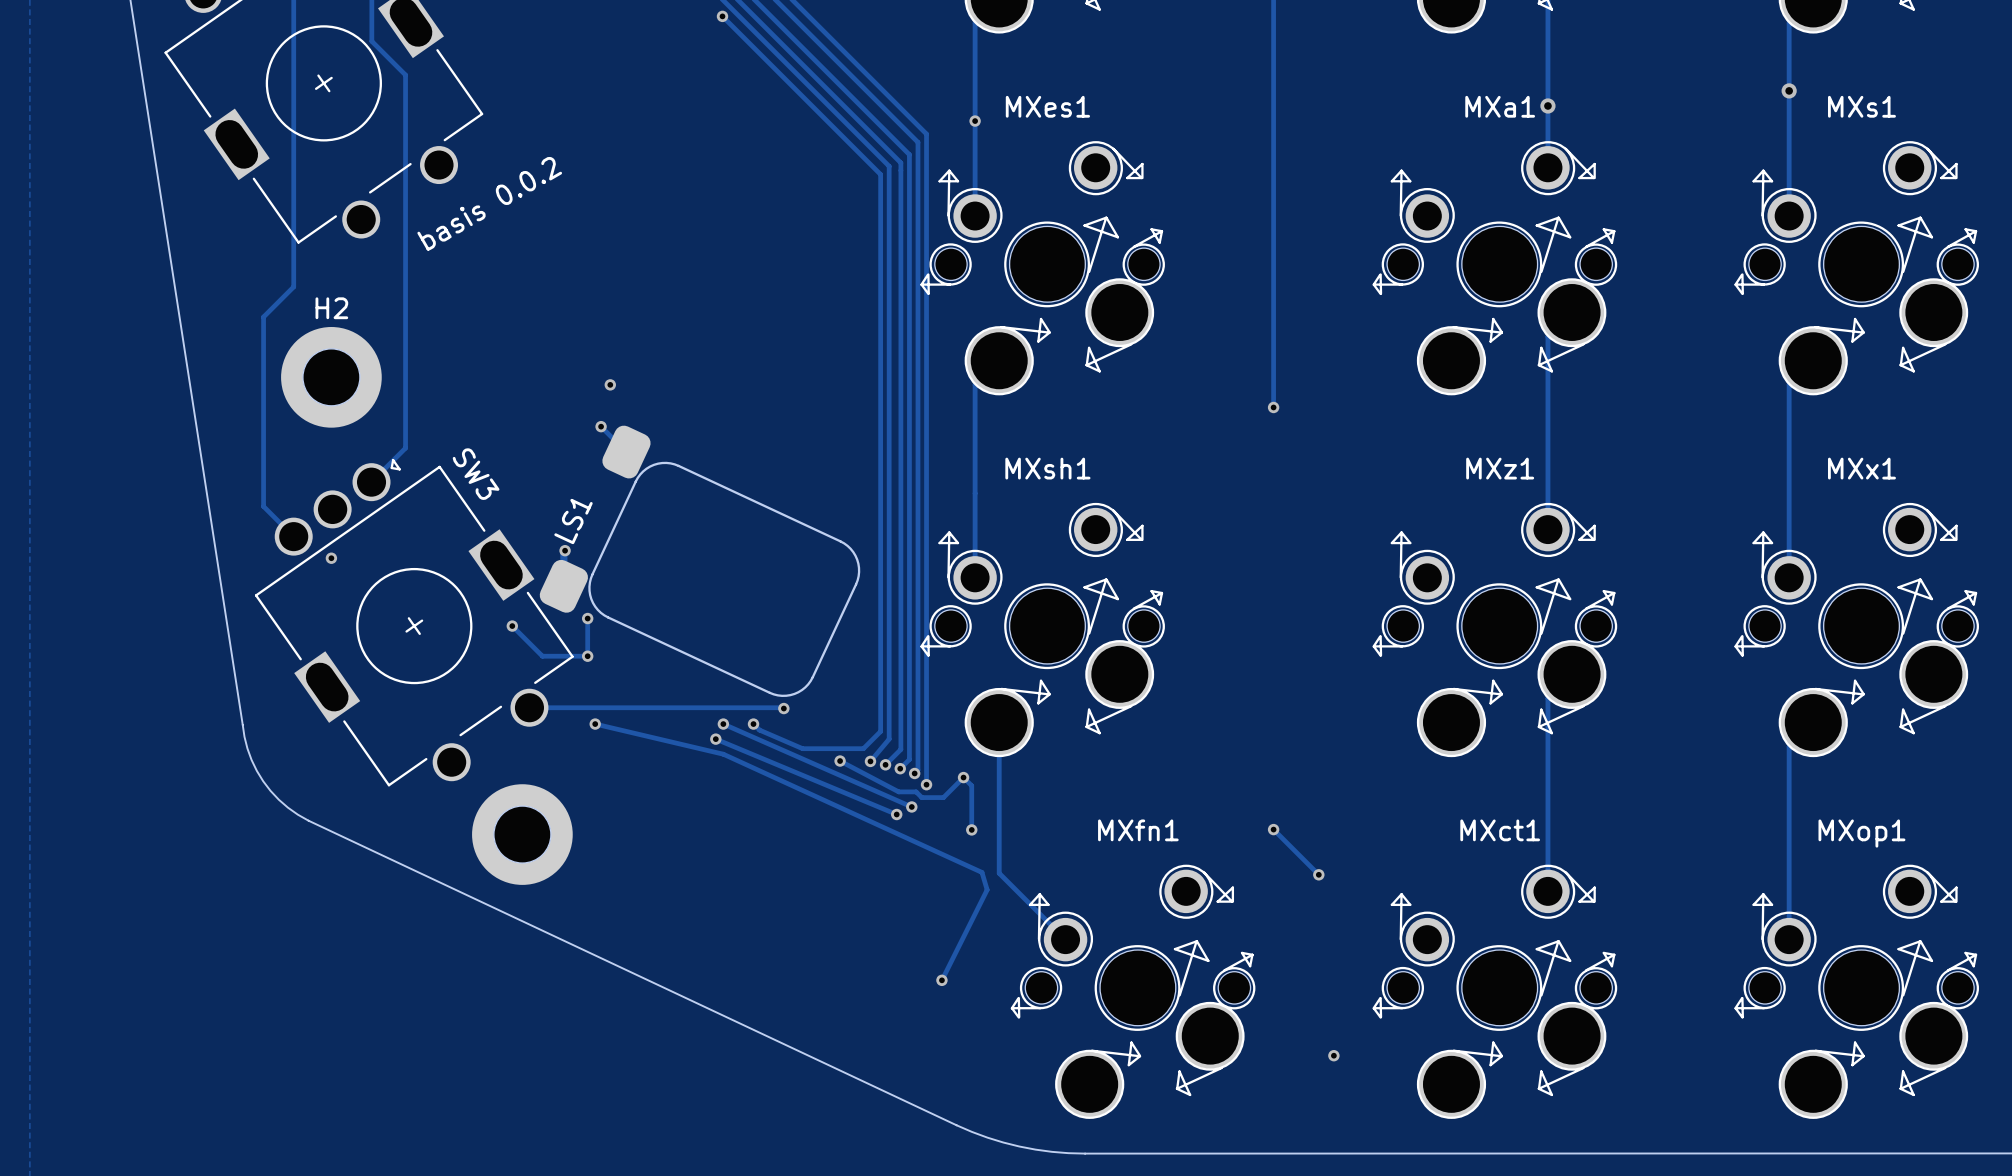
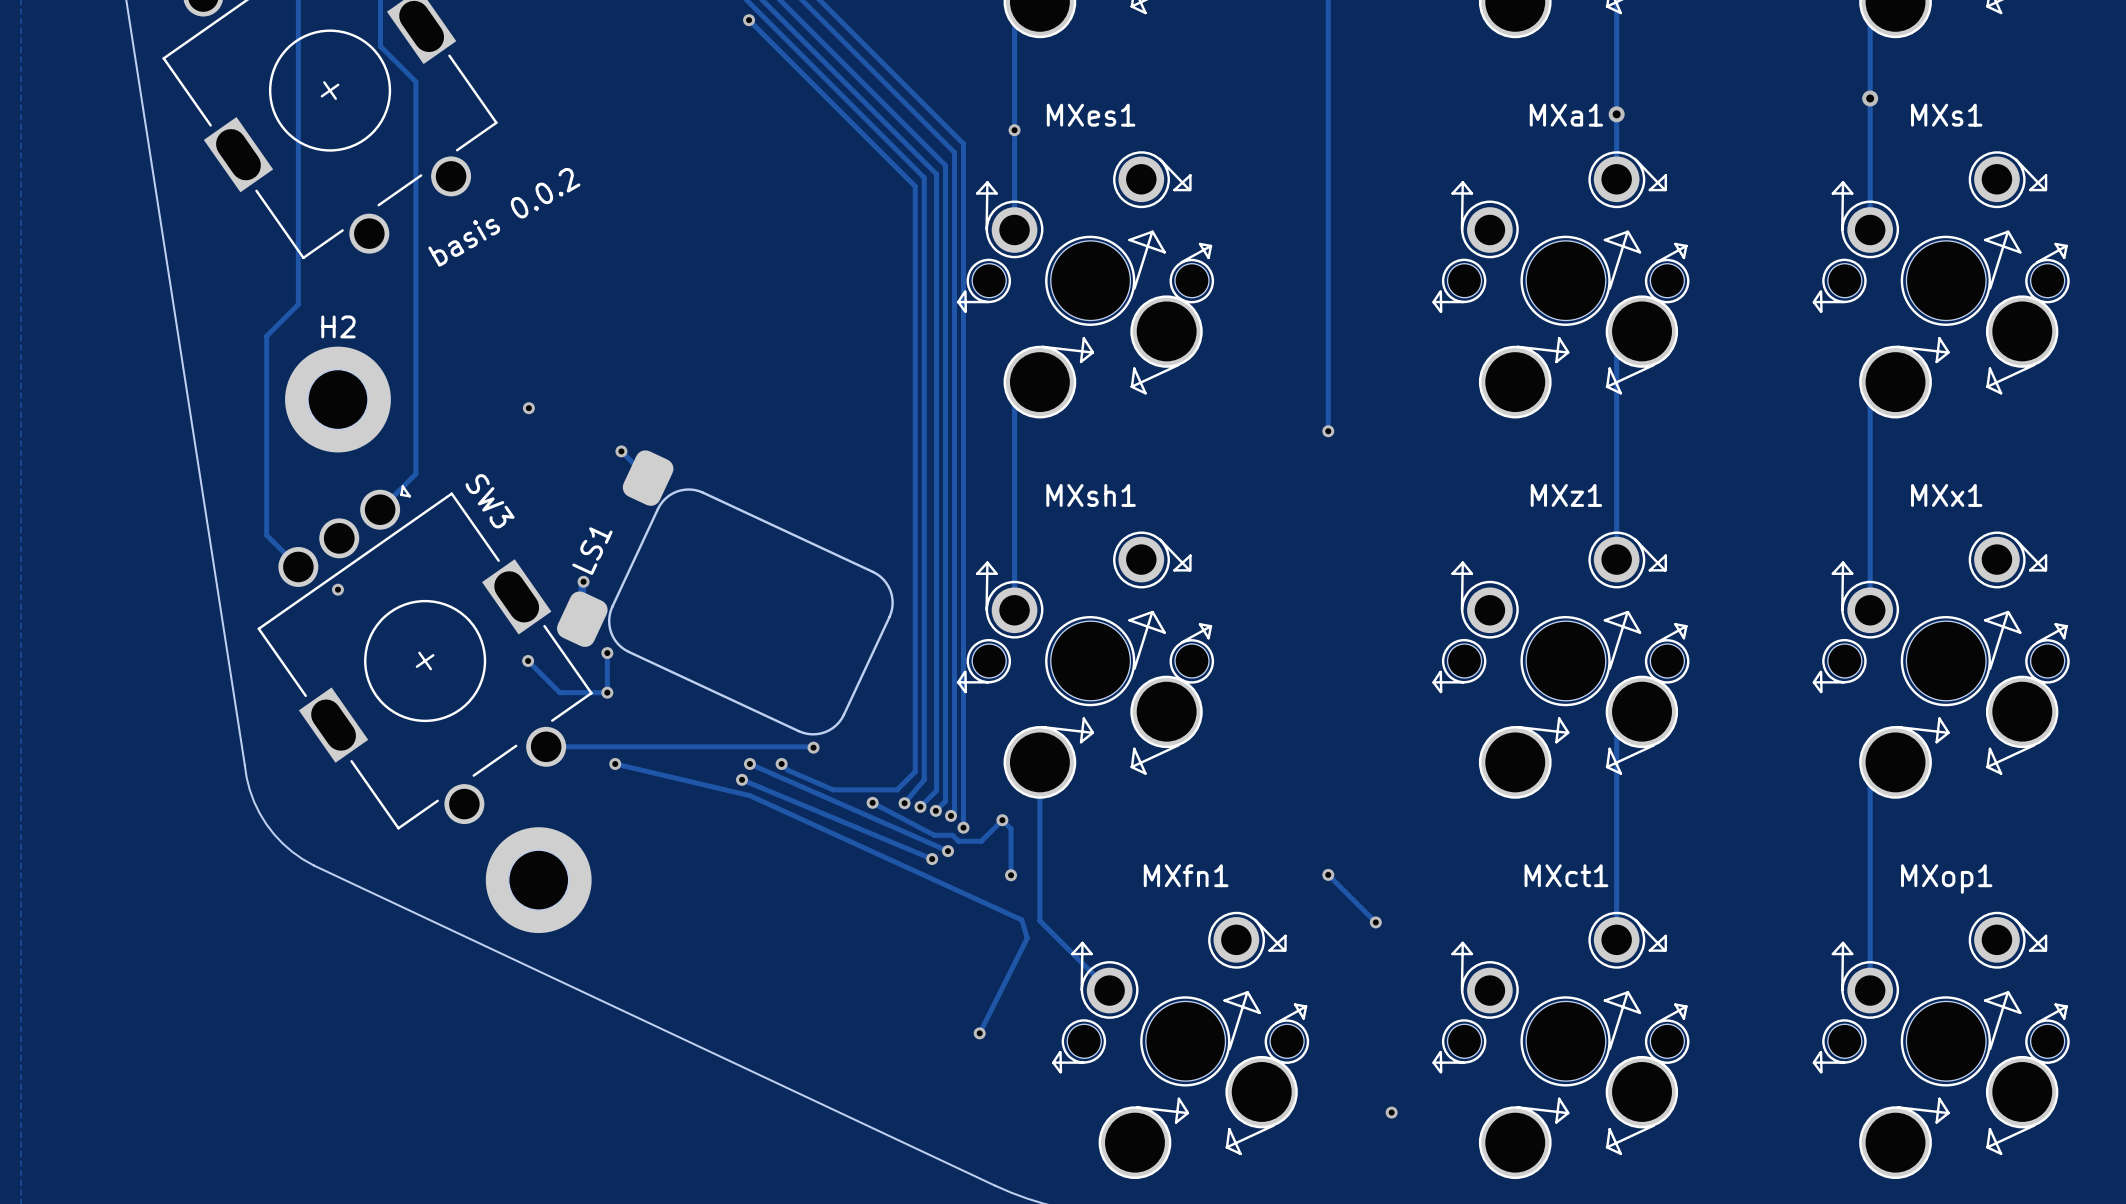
via position: (610, 384) -> (528, 408)

